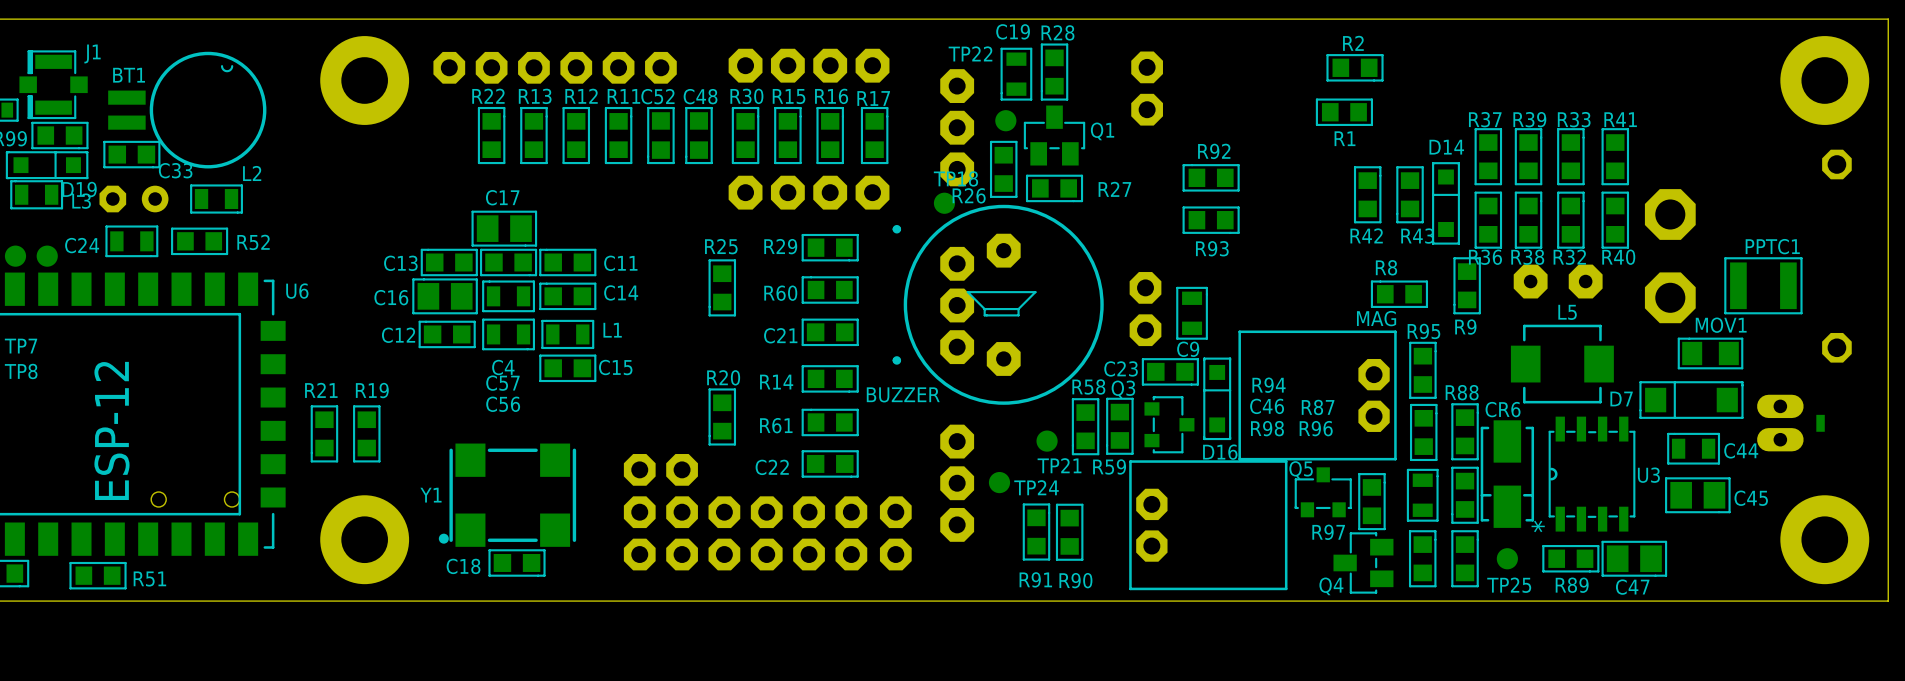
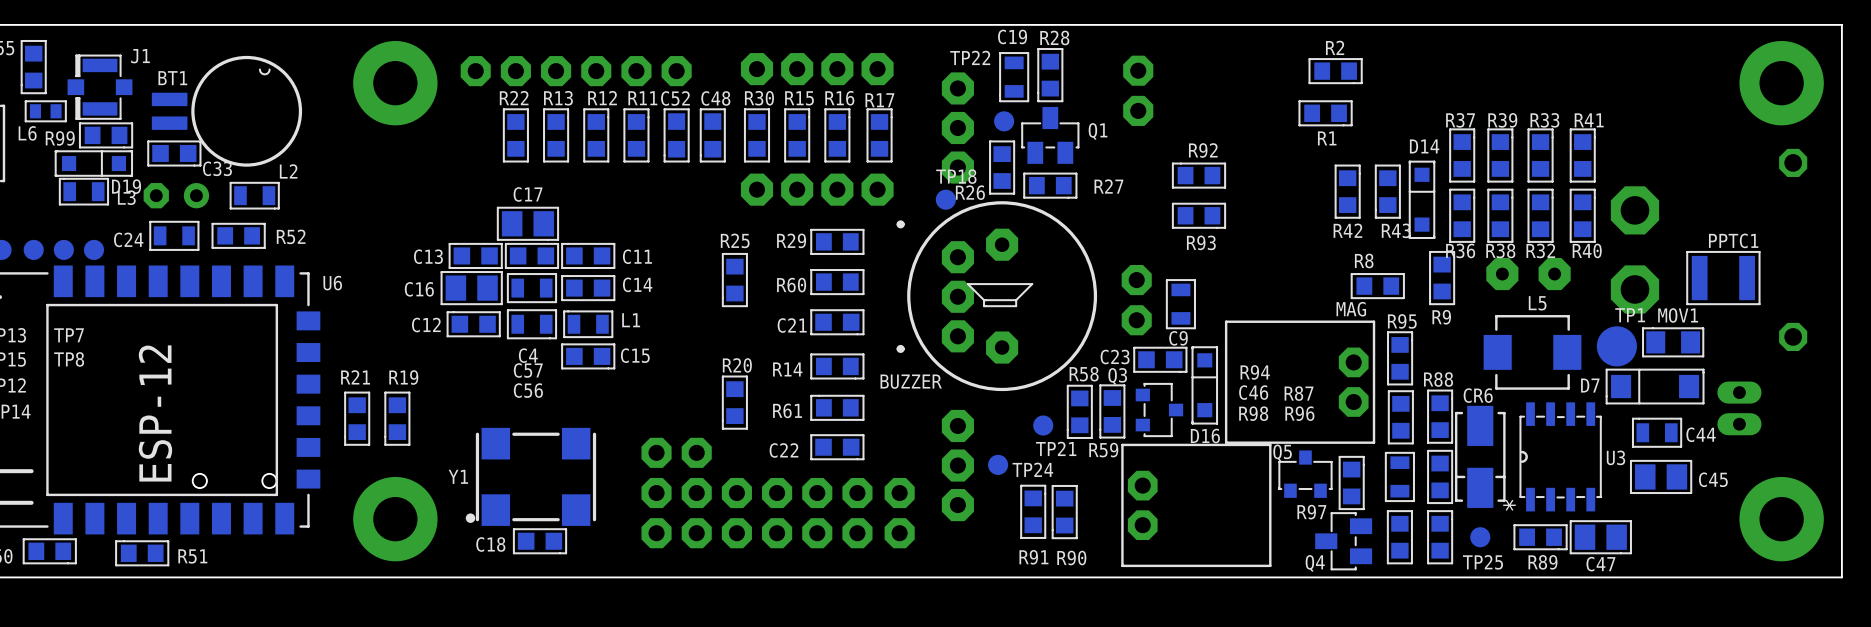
TP1: none -> (1616, 346)
part: (1820, 423) -> none

